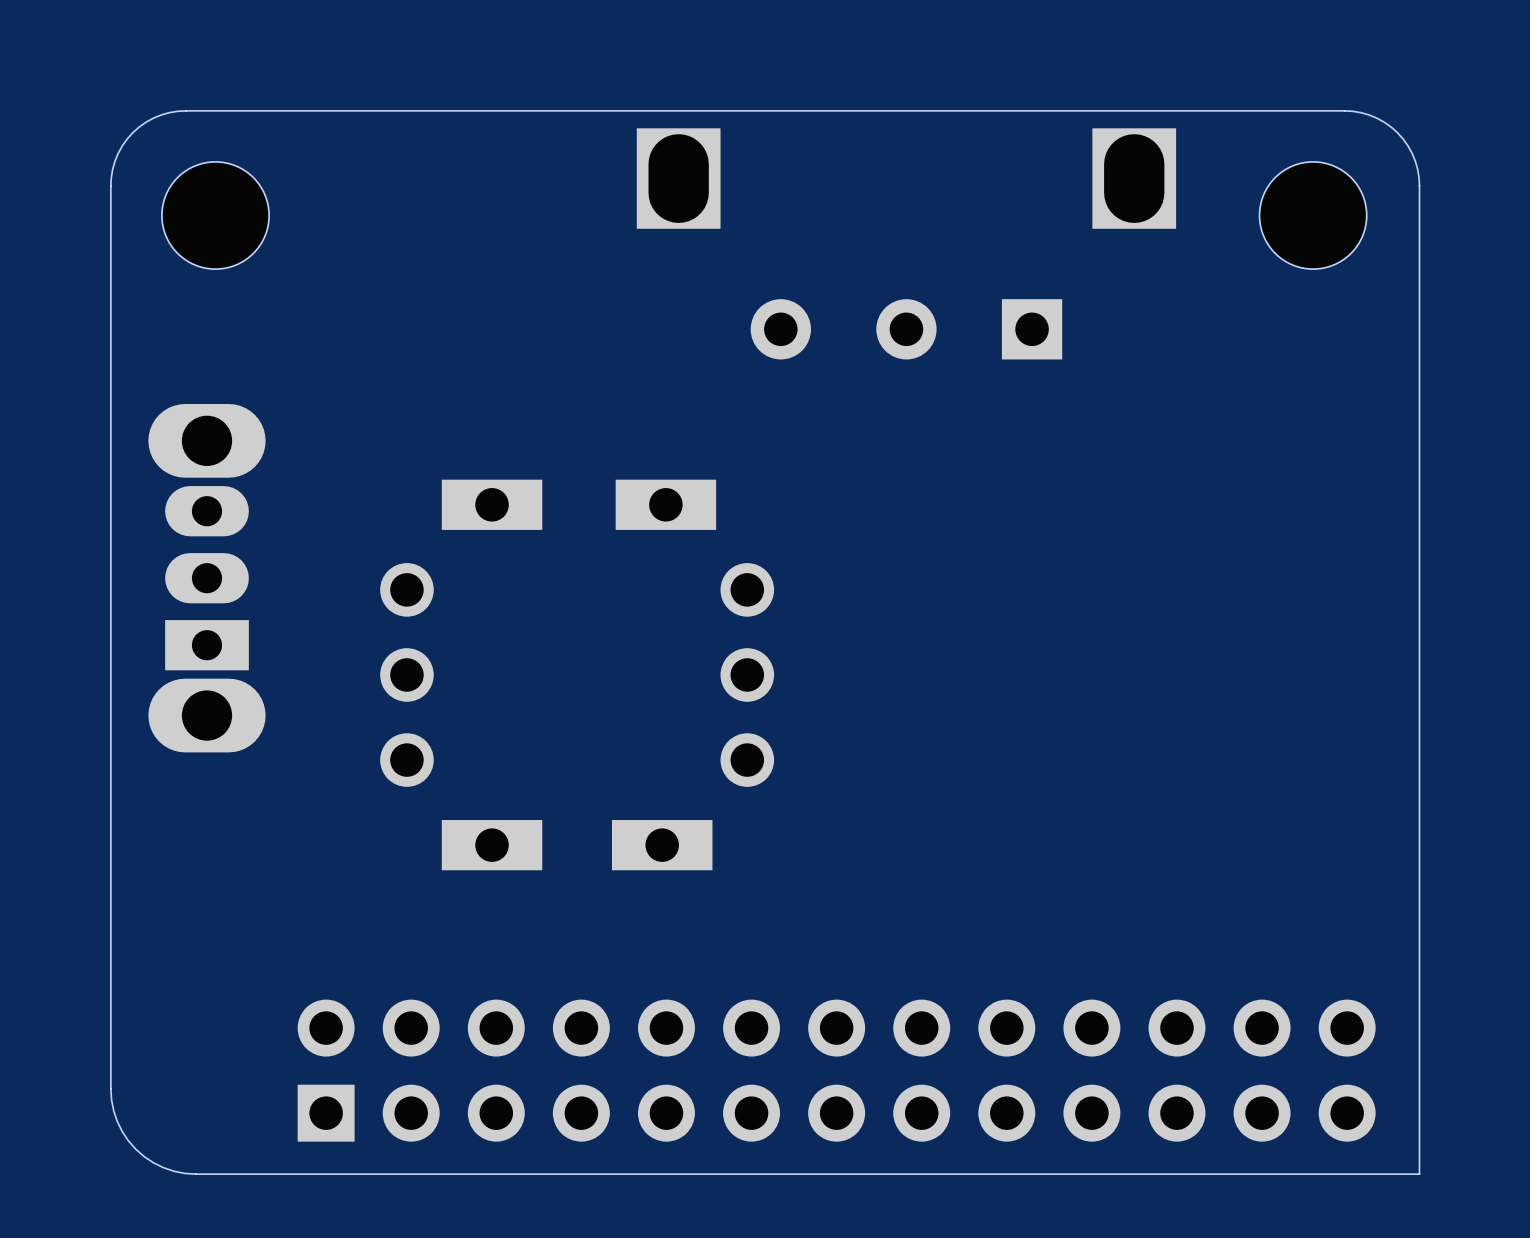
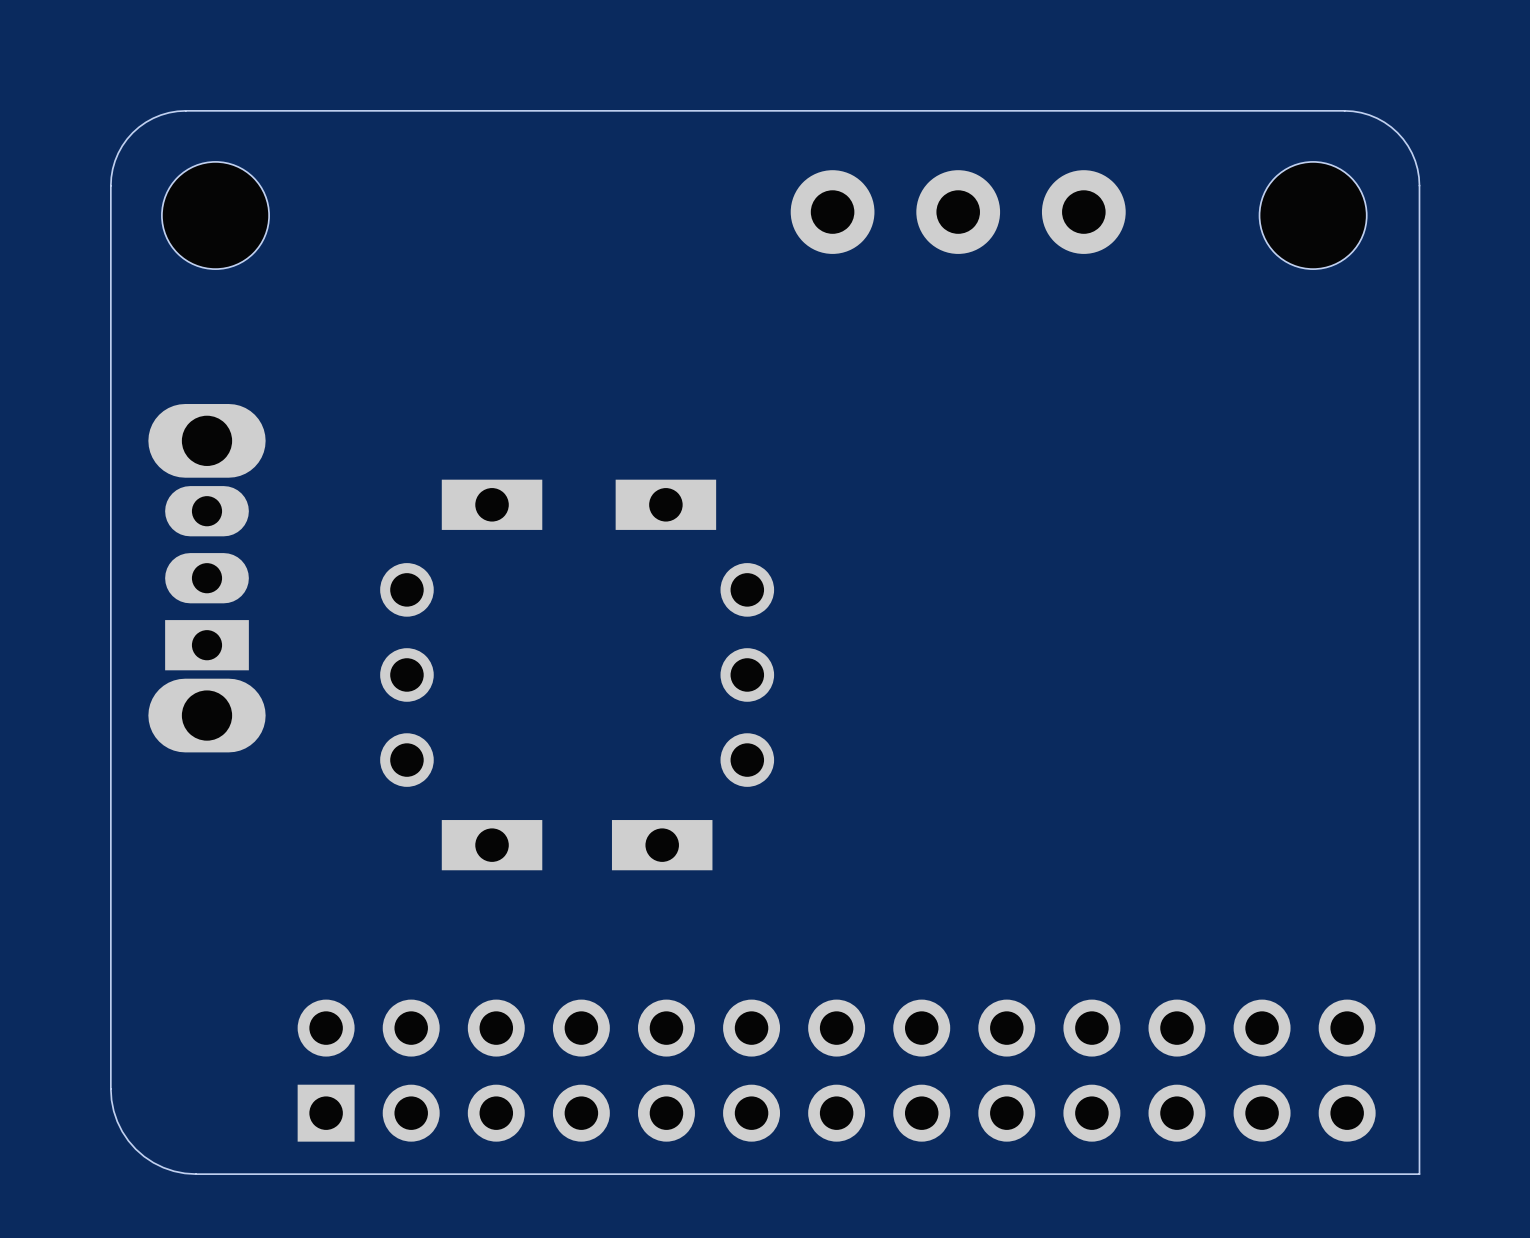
part: none -> (958, 212)
part: (906, 243) -> none

